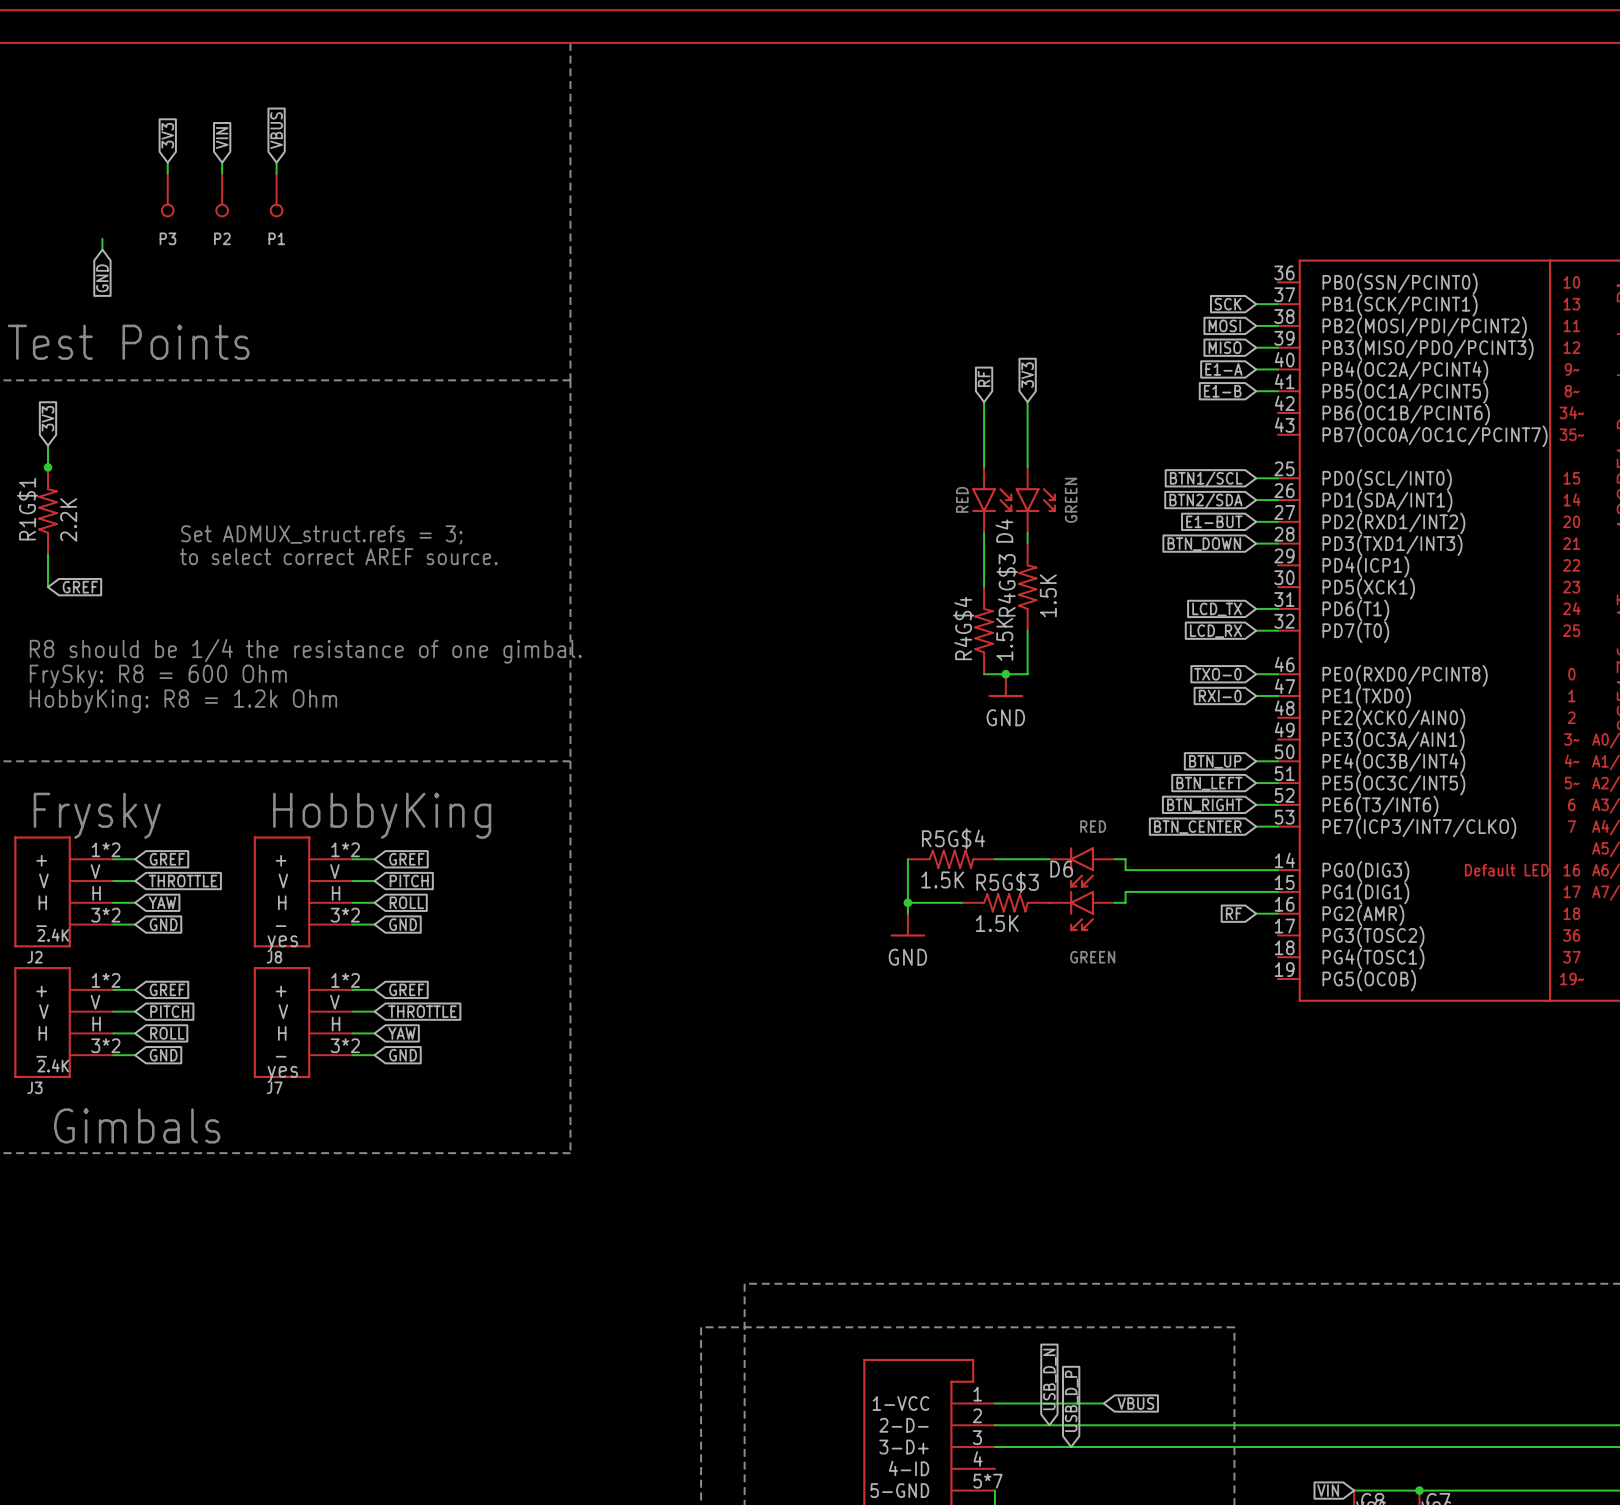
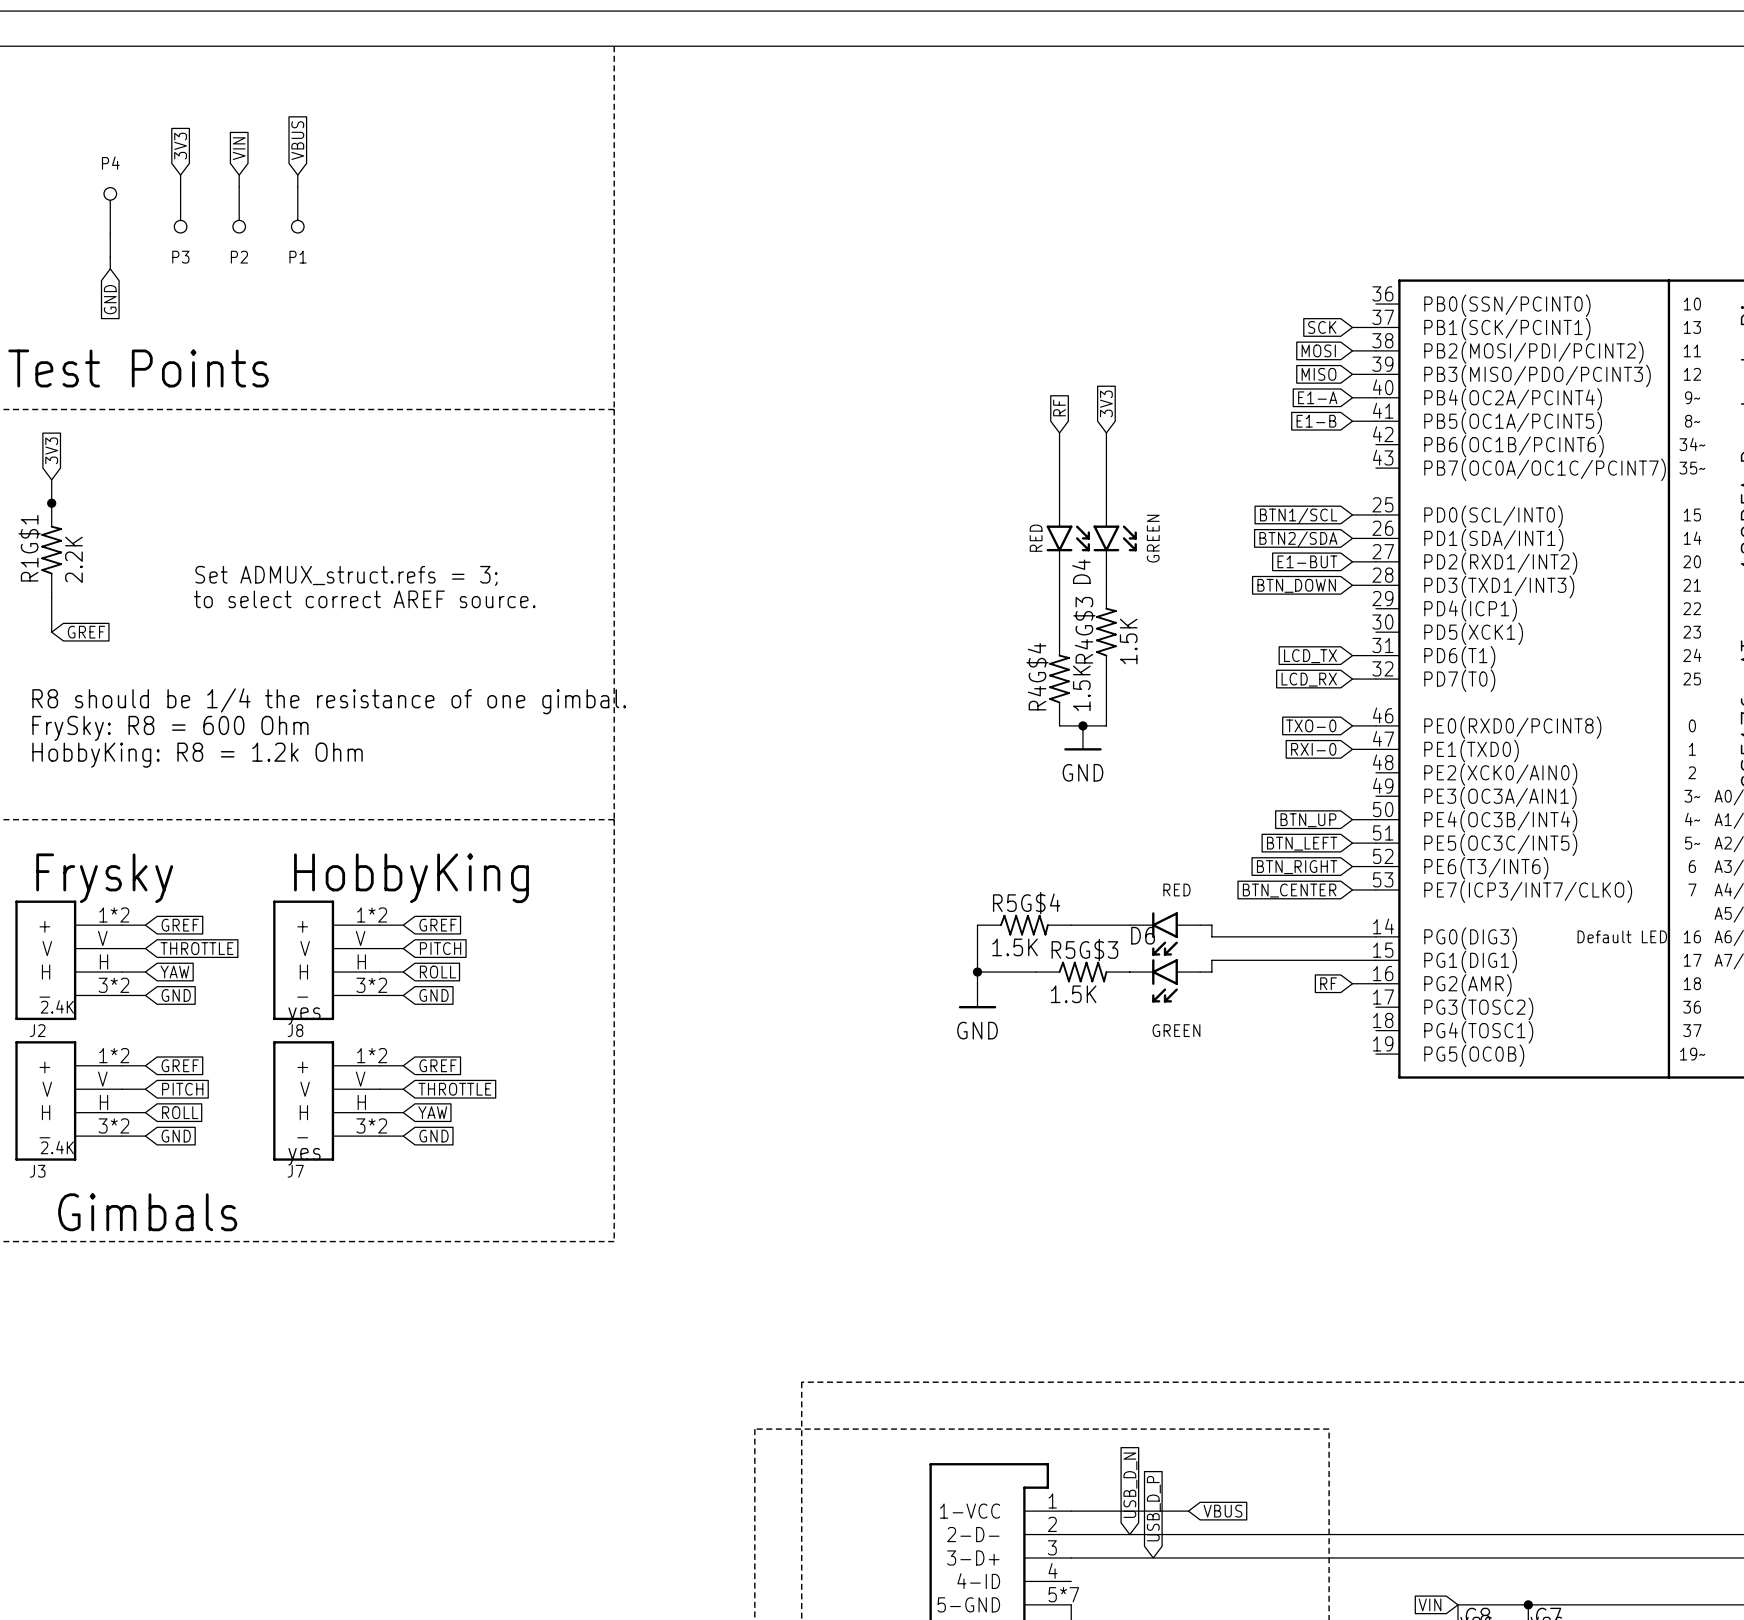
P4: none -> (110, 210)
wire: none -> (110, 233) (110, 257)

